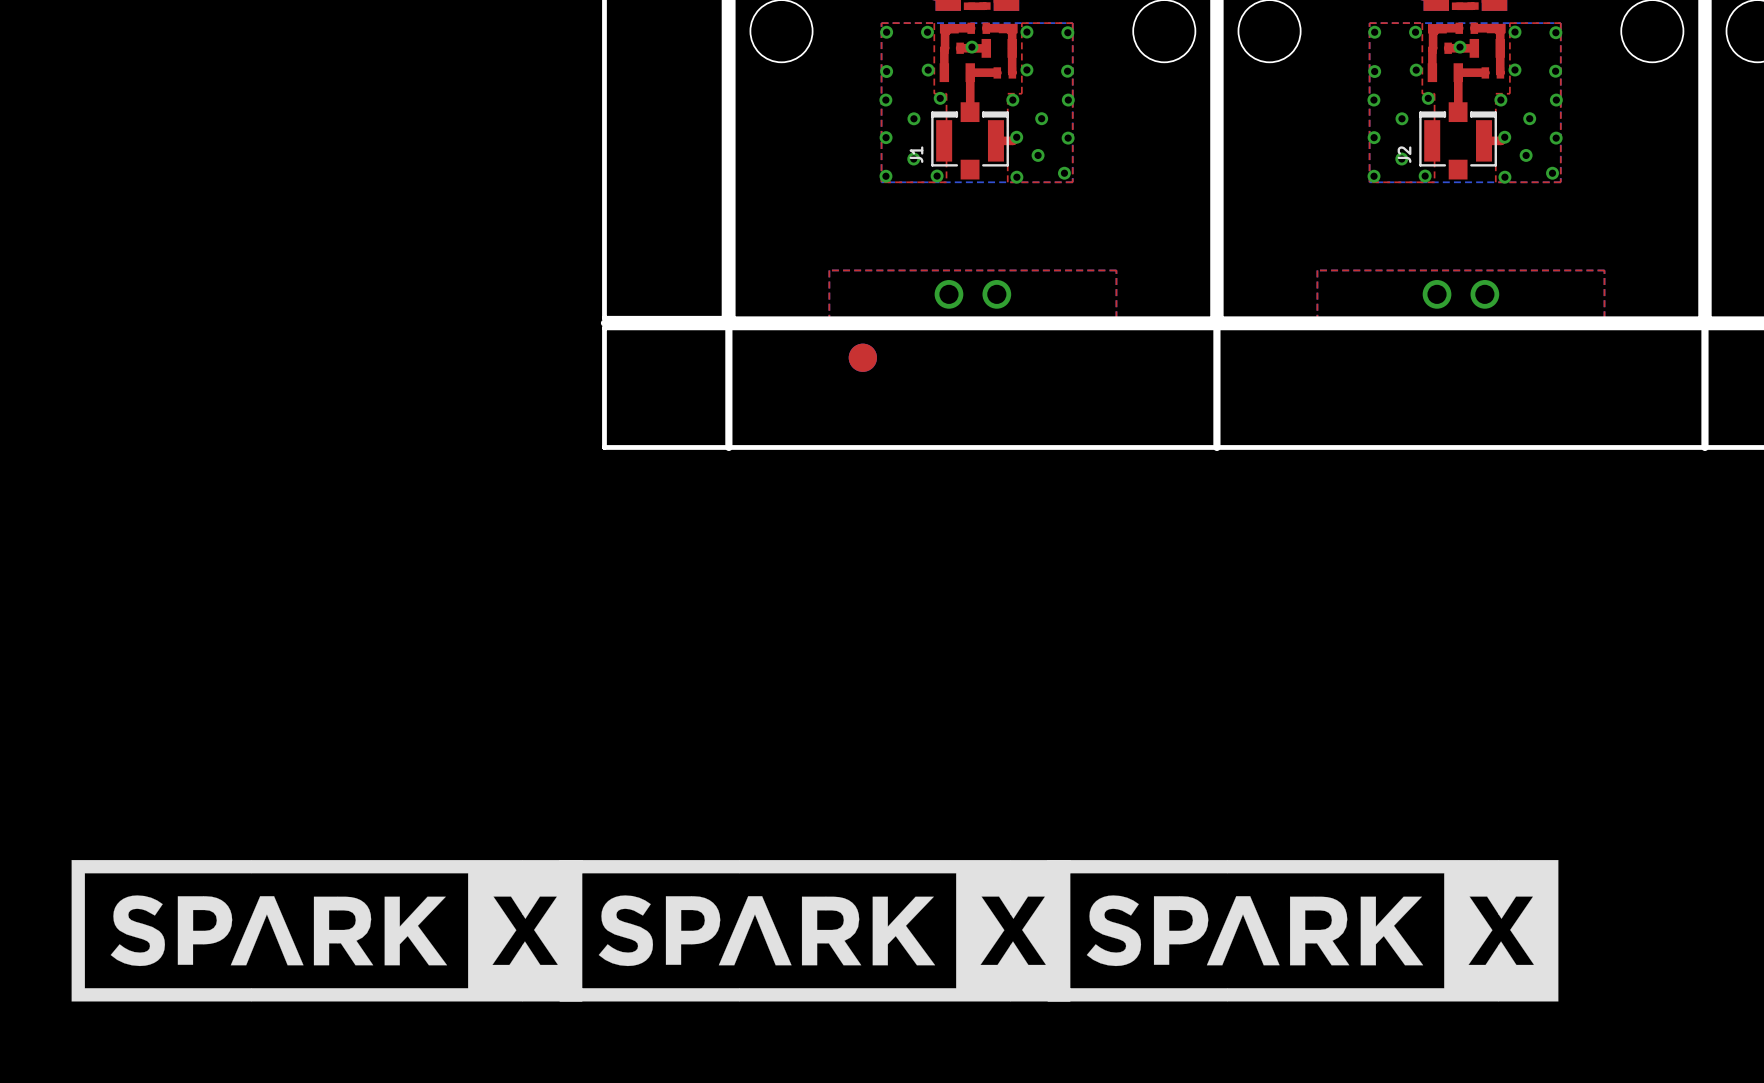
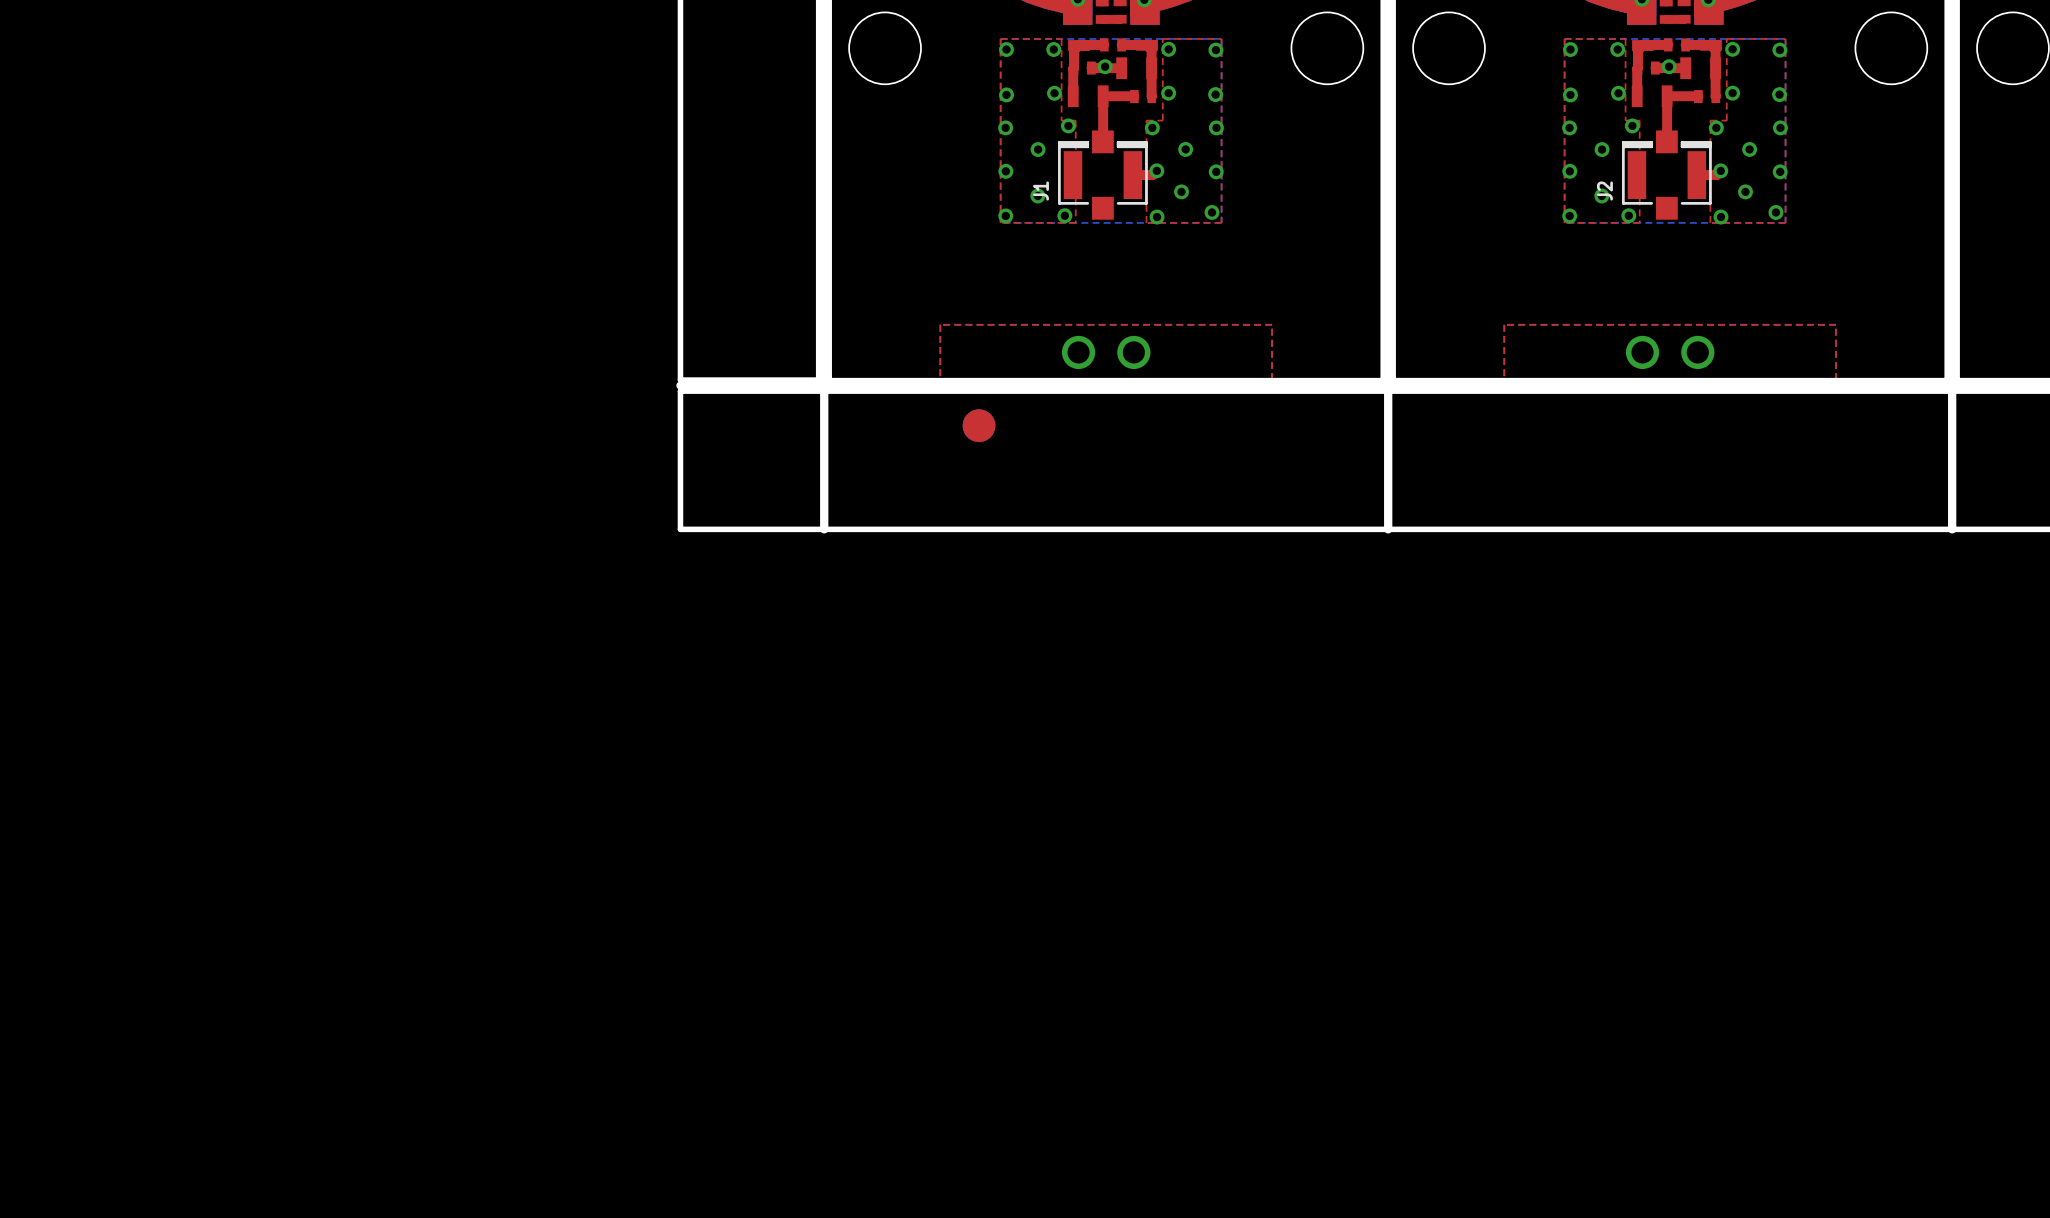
drawing: [71, 860, 1559, 1002] -> none

